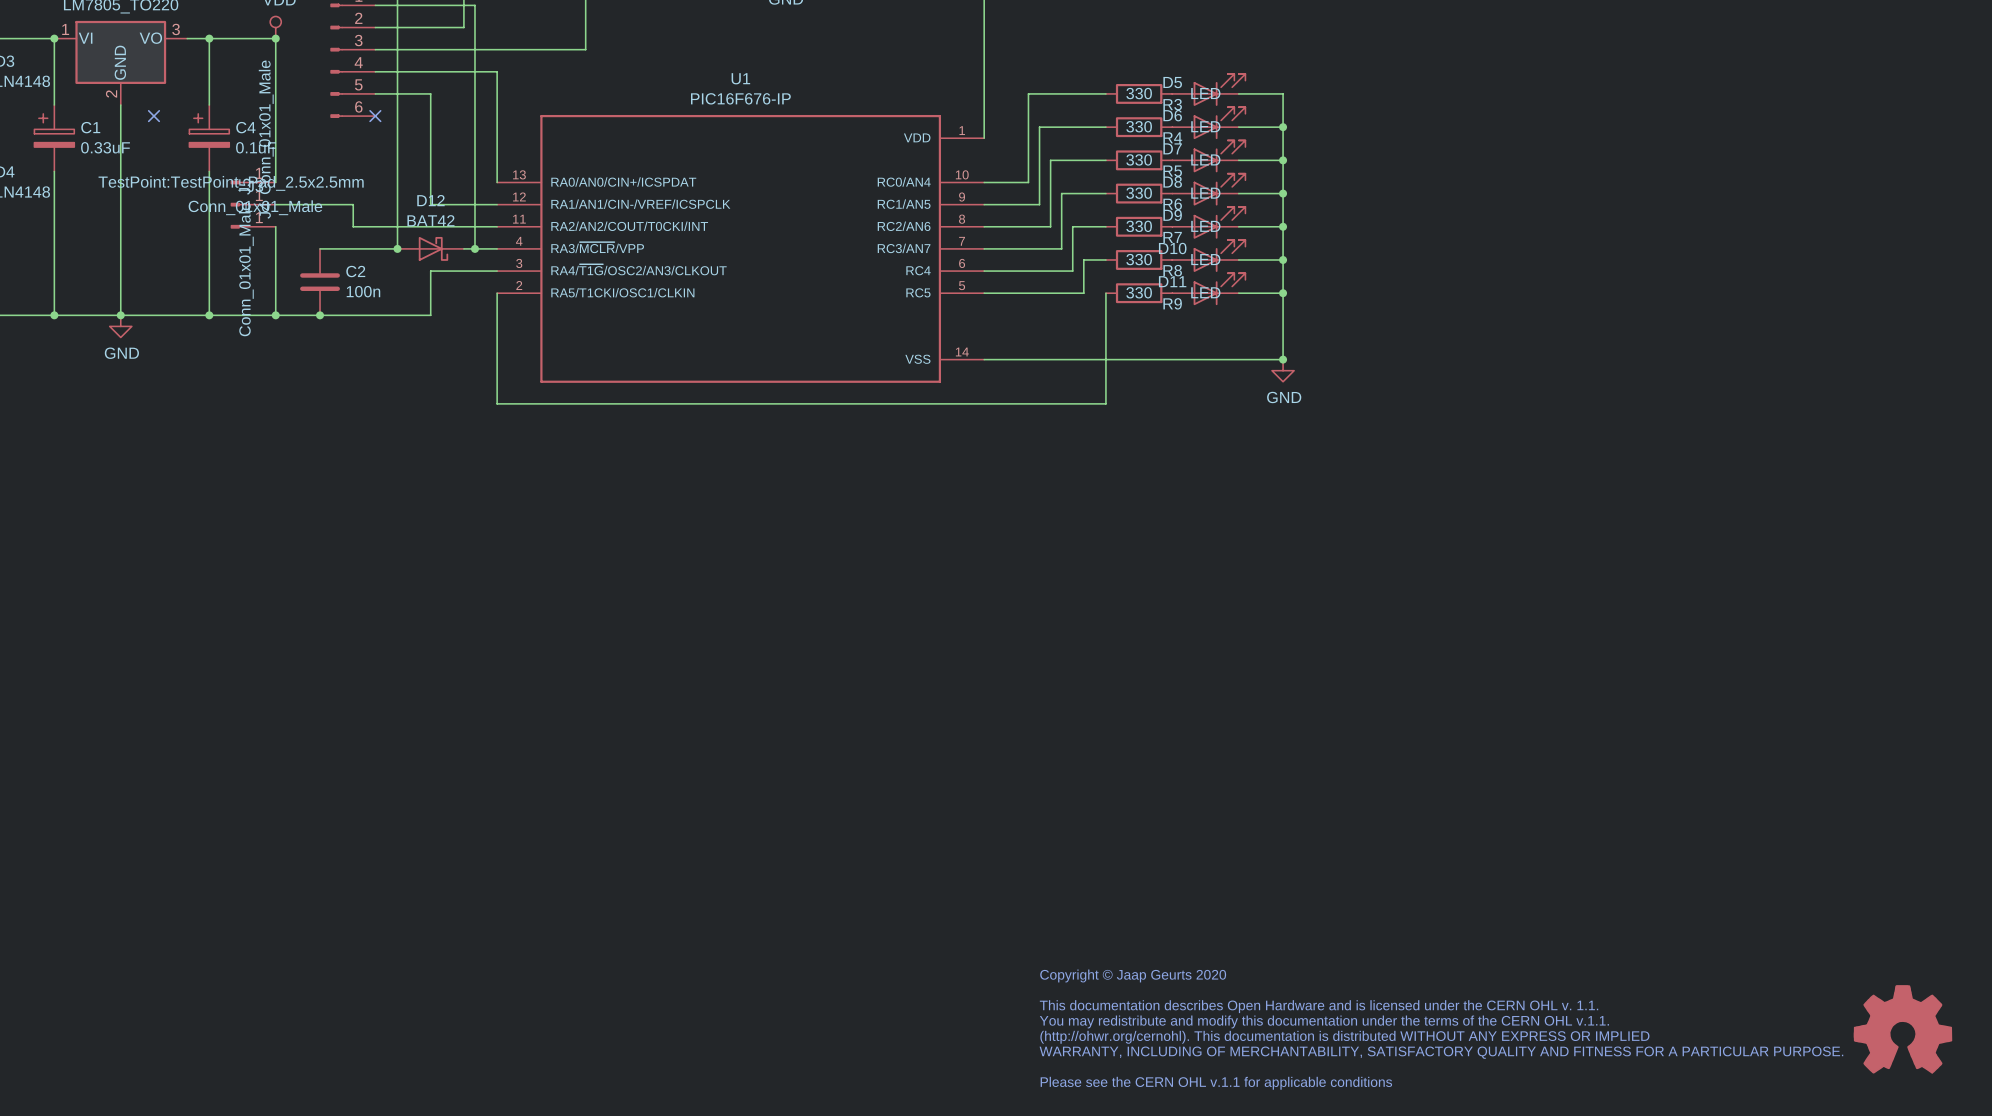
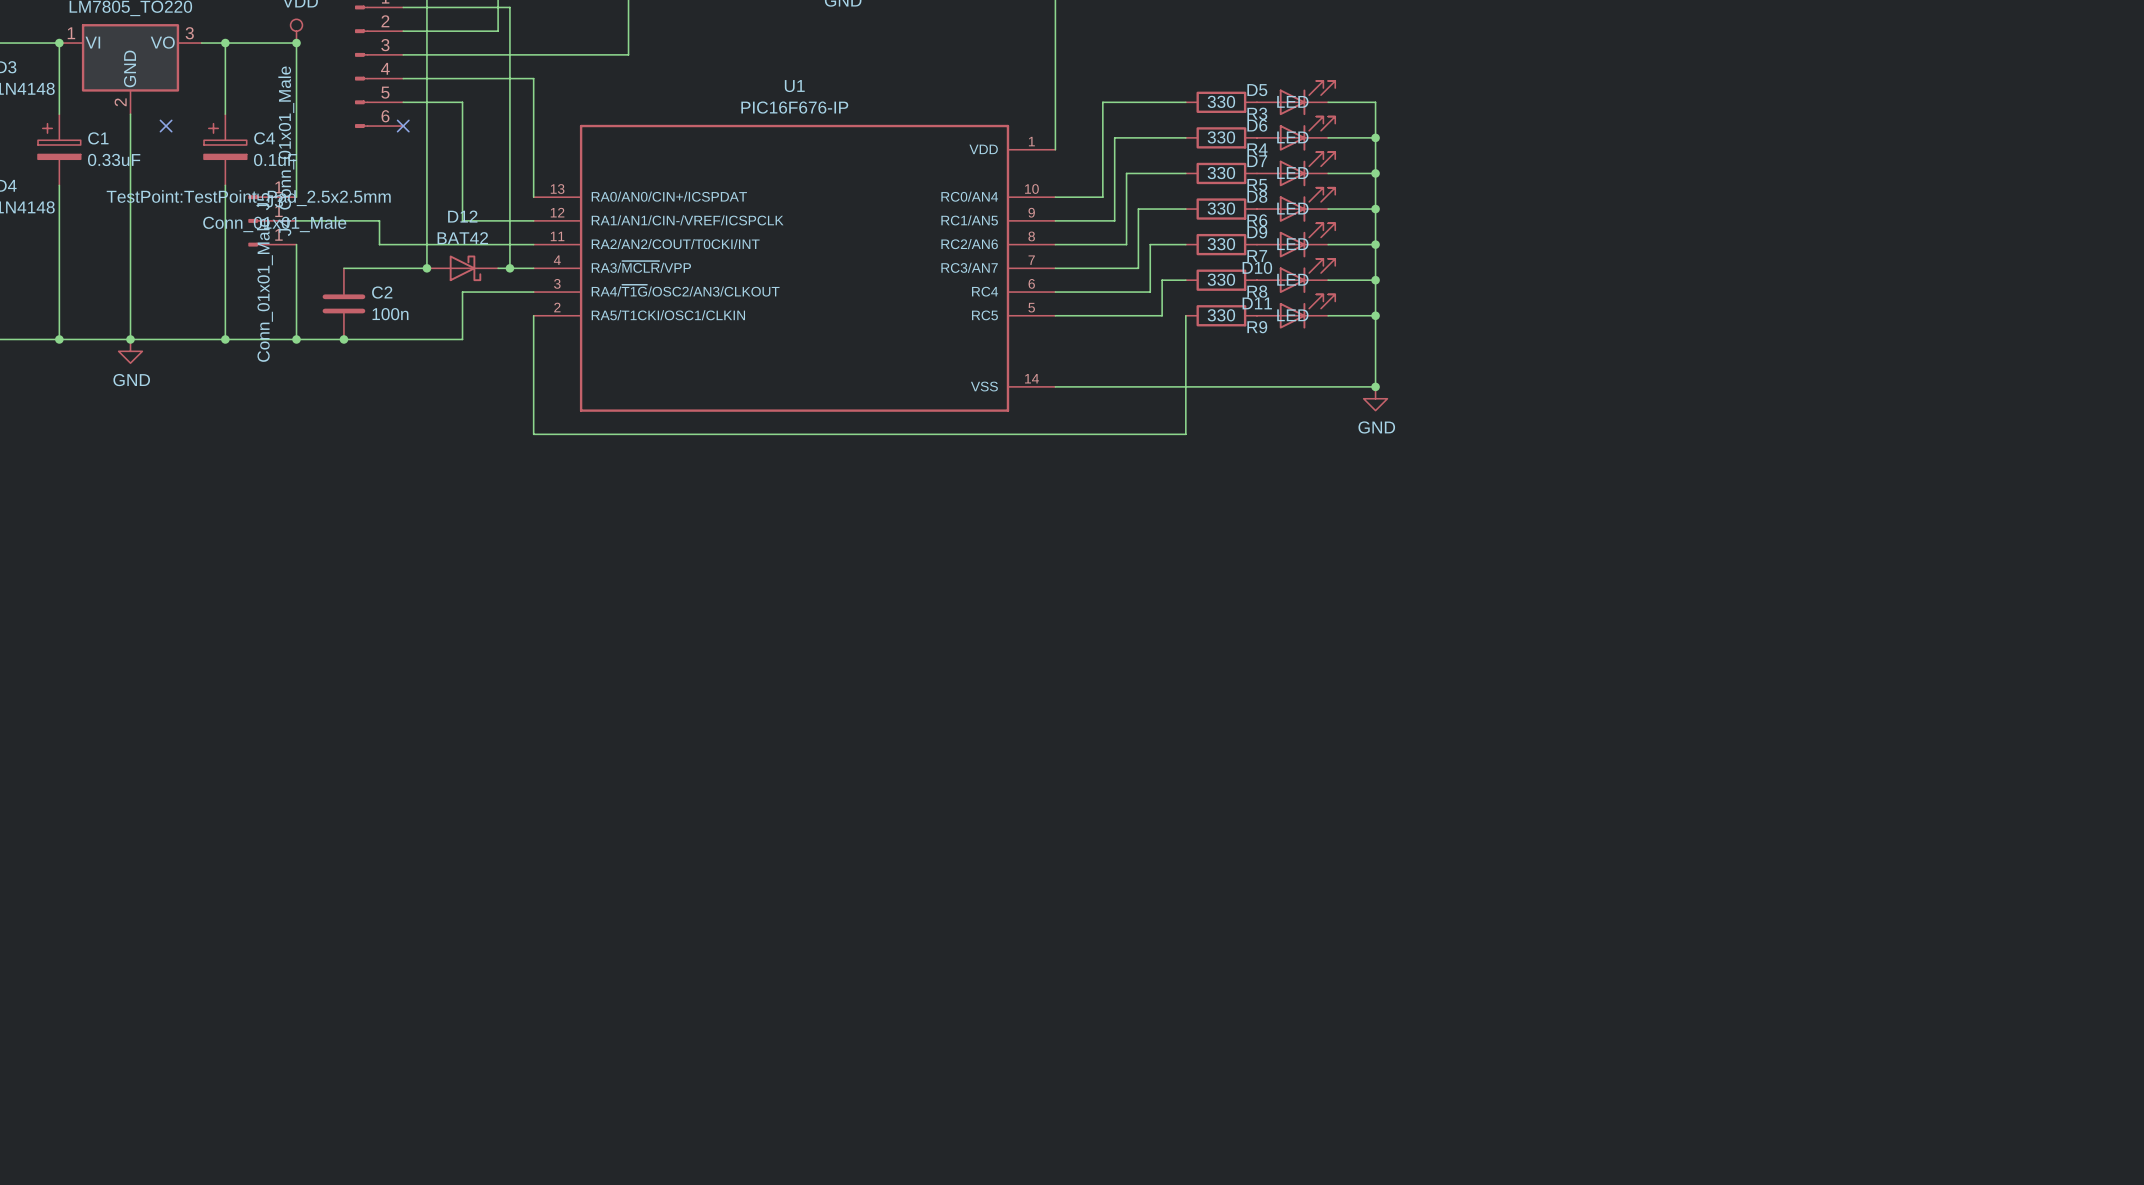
text: Copyright © Jaap Geurts 2020 (1133, 975) -> none
text: This documentation describes Open Hardware and is licensed under the CERN OHL v. 1.1. (1319, 1006) -> none
text: You may redistribute and modify this documentation under the terms of the CERN OHL v.1.1. (1324, 1021) -> none
power symbol: (1902, 1029) -> none
text: (http://ohwr.org/cernohl). This documentation is distributed WITHOUT ANY EXPRESS OR IMPLIED (1344, 1037) -> none
text: WARRANTY, INCLUDING OF MERCHANTABILITY, SATISFACTORY QUALITY AND FITNESS FOR A PARTICULAR PURPOSE. (1441, 1052) -> none
text: Please see the CERN OHL v.1.1 for applicable conditions (1216, 1083) -> none

